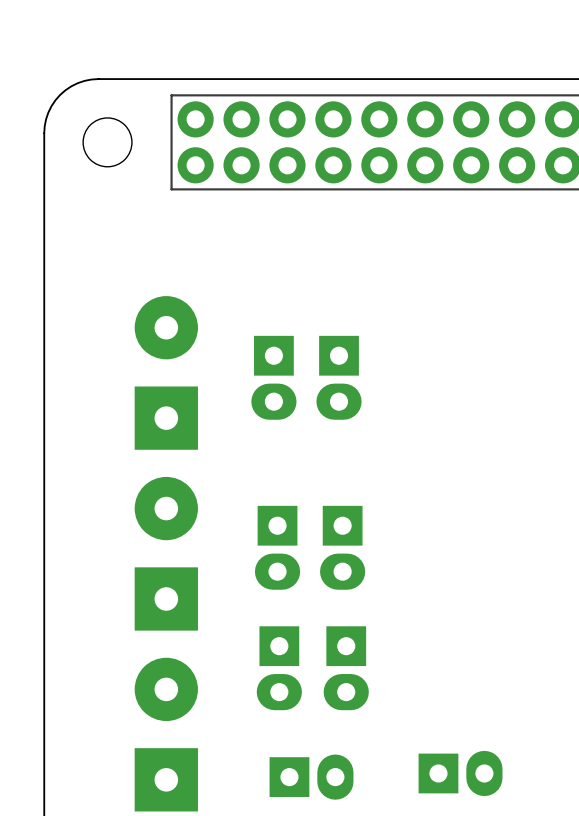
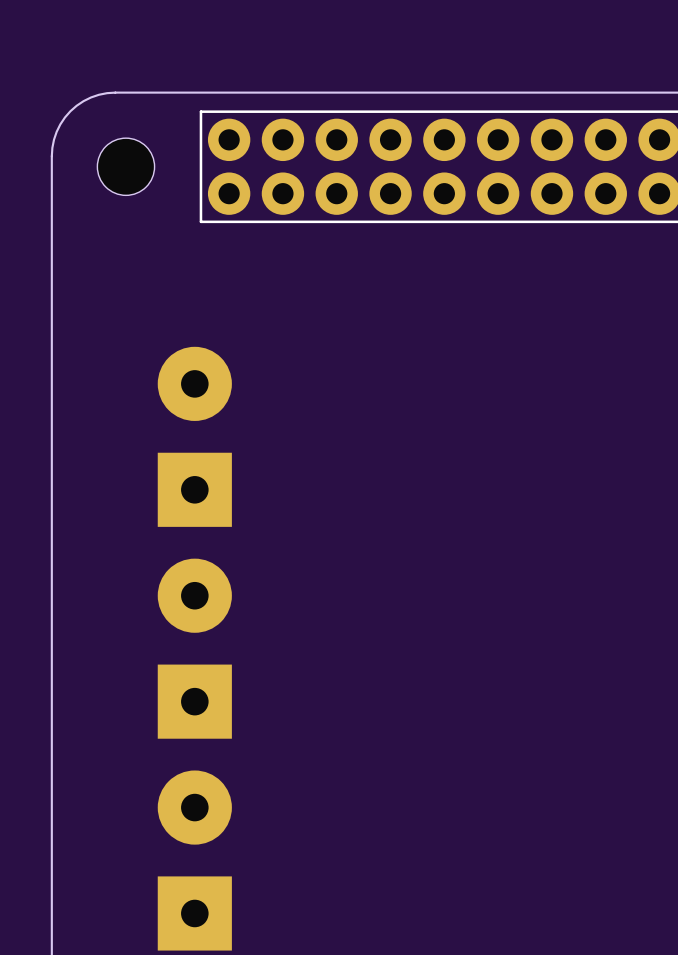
part: (273, 377) -> none
part: (339, 377) -> none
part: (277, 547) -> none
part: (342, 547) -> none
part: (279, 668) -> none
part: (346, 668) -> none
part: (460, 773) -> none
part: (311, 777) -> none

